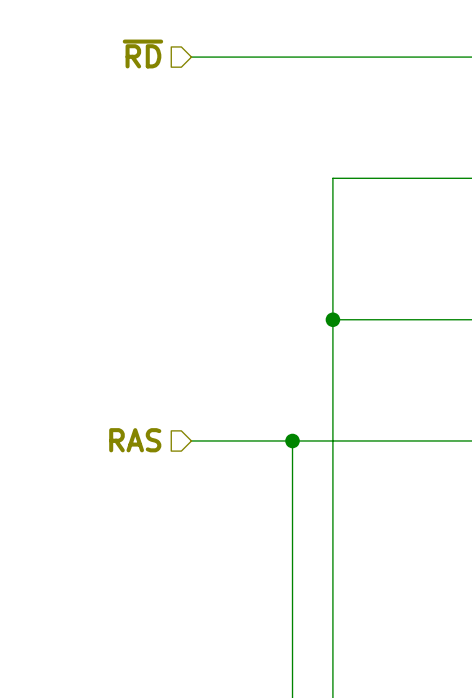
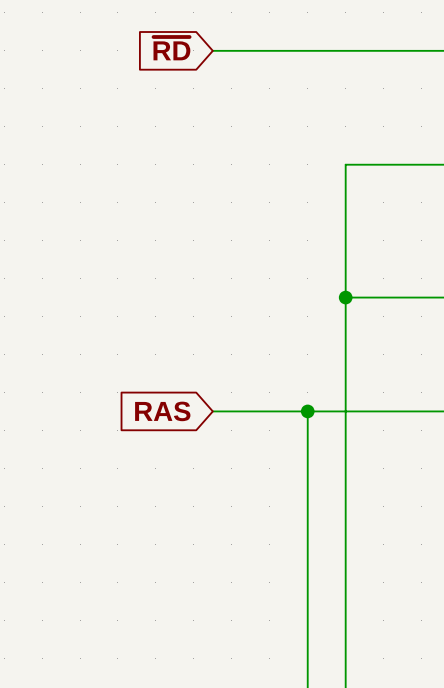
hierarchical label: ~{RD} (142, 53) -> none
global label: none -> ~{RD} (171, 48)
hierarchical label: RAS (135, 440) -> none
global label: none -> RAS (162, 411)

